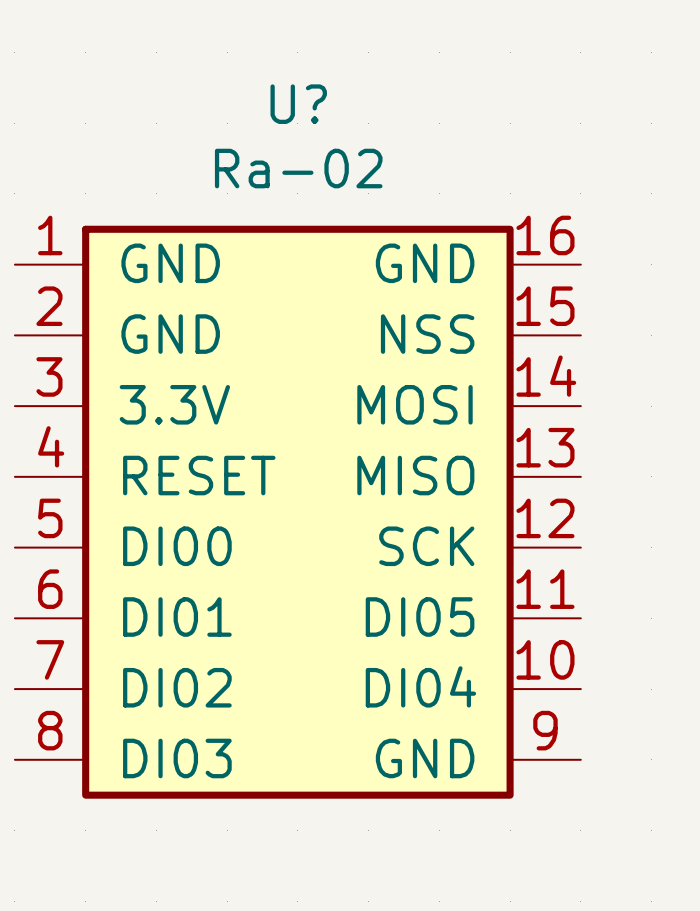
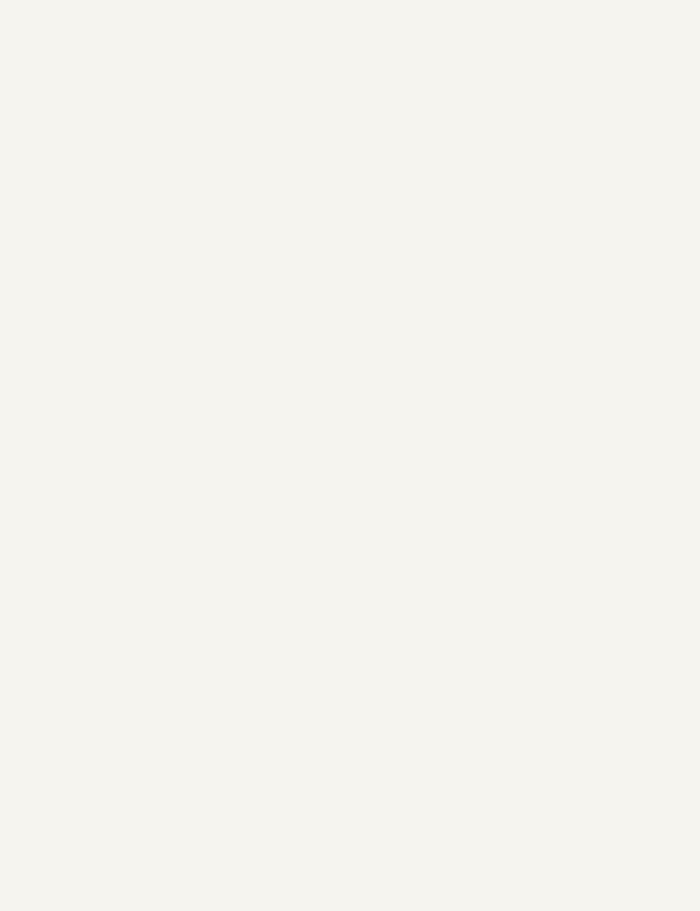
U?: Ra-02 (297, 512) -> none

